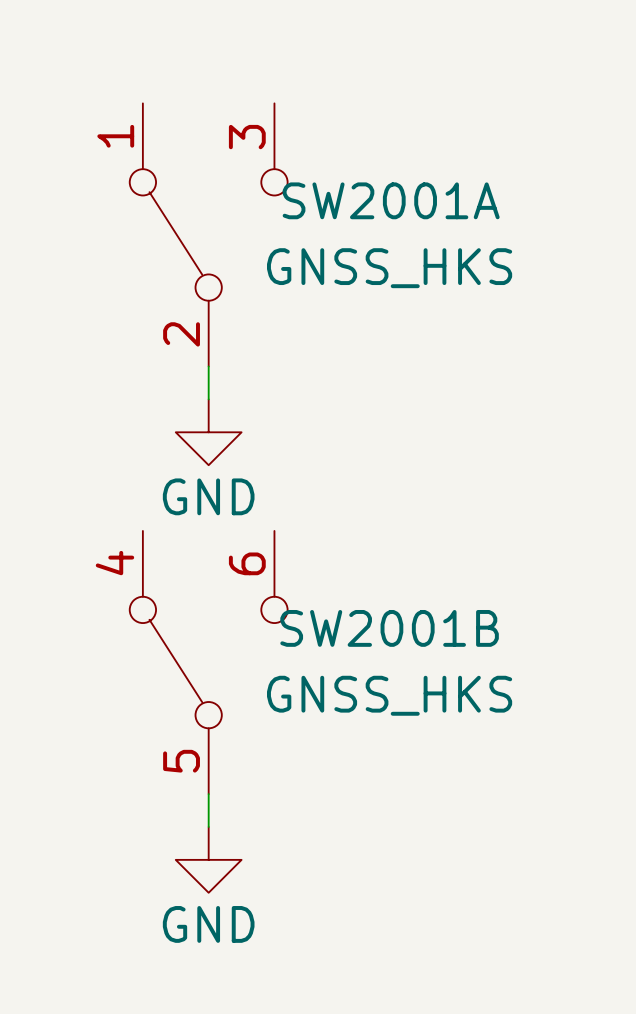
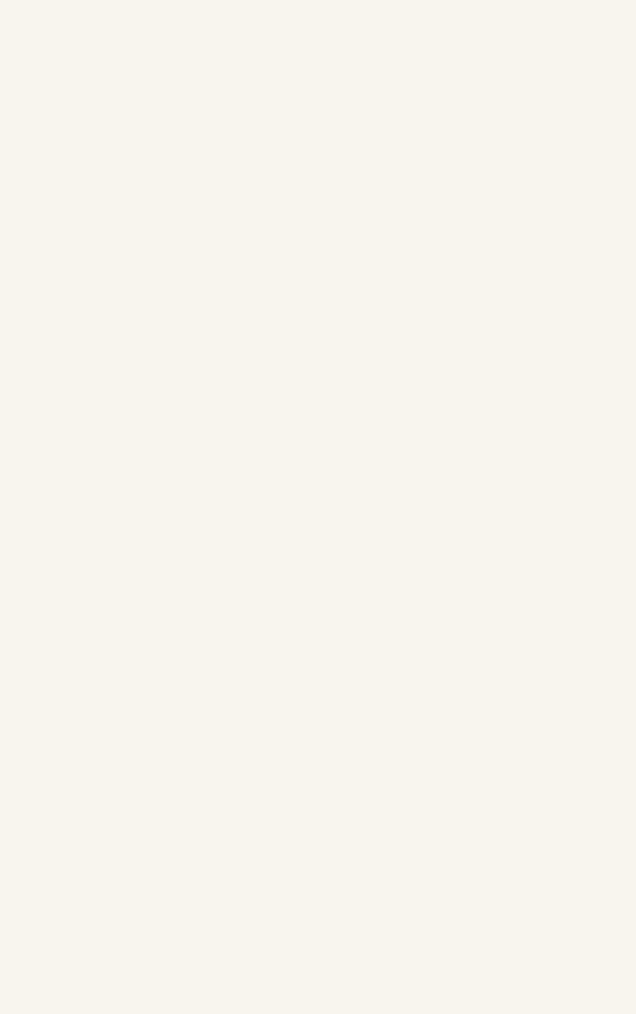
SW2001A: GNSS_HKS (208, 234) -> none
wire: (208, 366) (208, 399) -> none
power symbol: GND (208, 432) -> none
SW2001B: GNSS_HKS (208, 662) -> none
wire: (208, 794) (208, 826) -> none
power symbol: GND (208, 859) -> none

